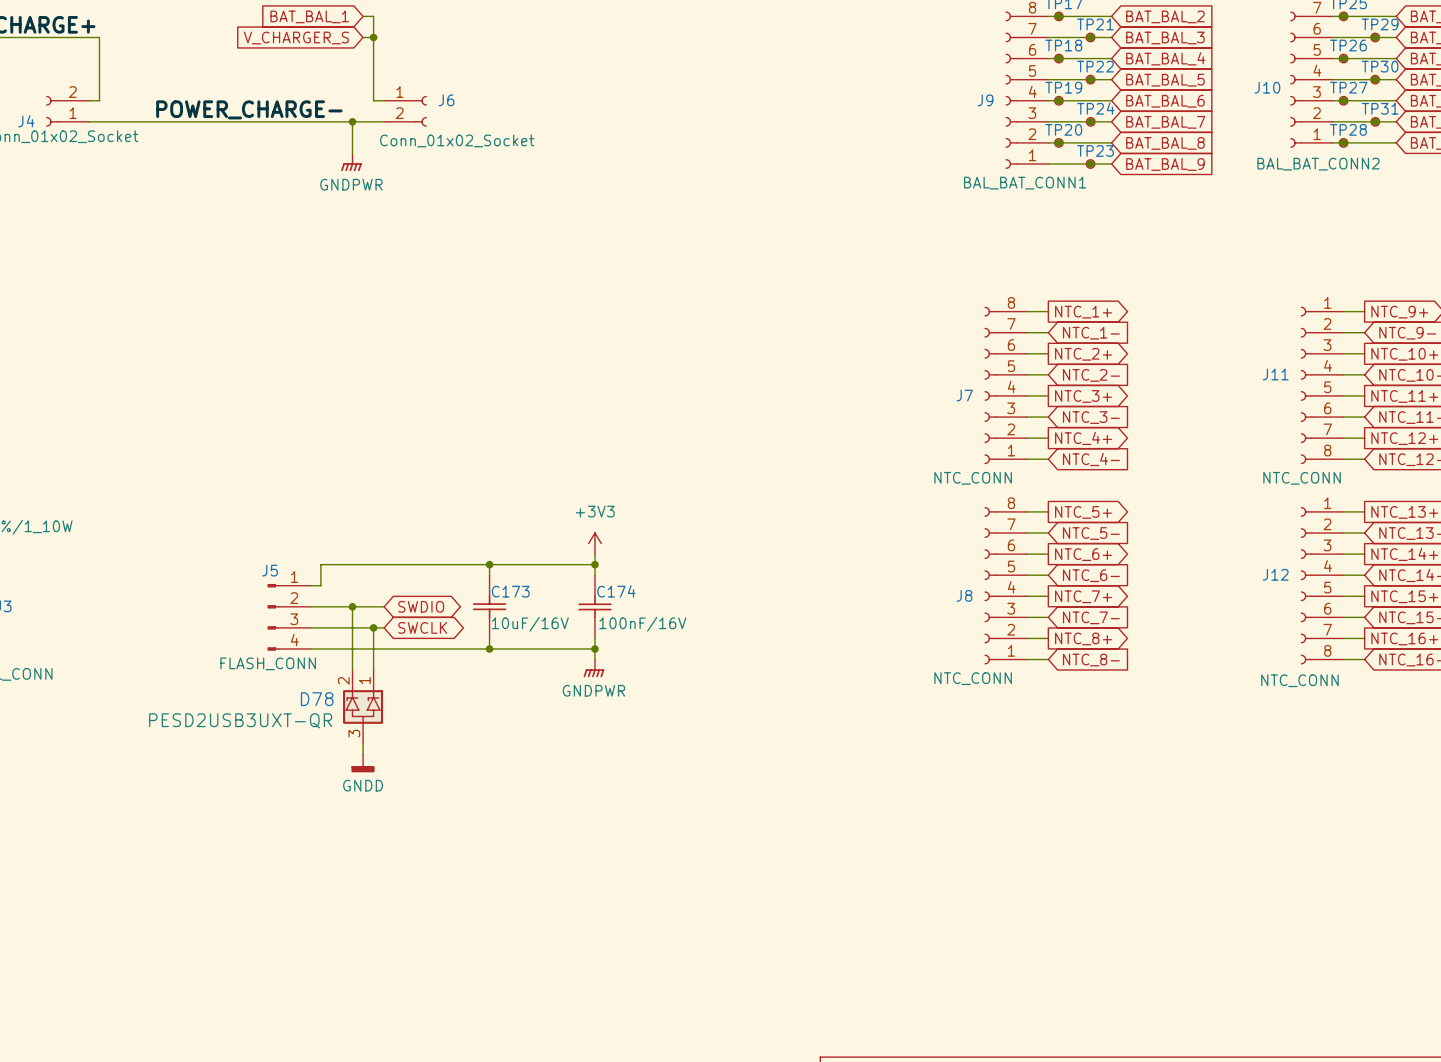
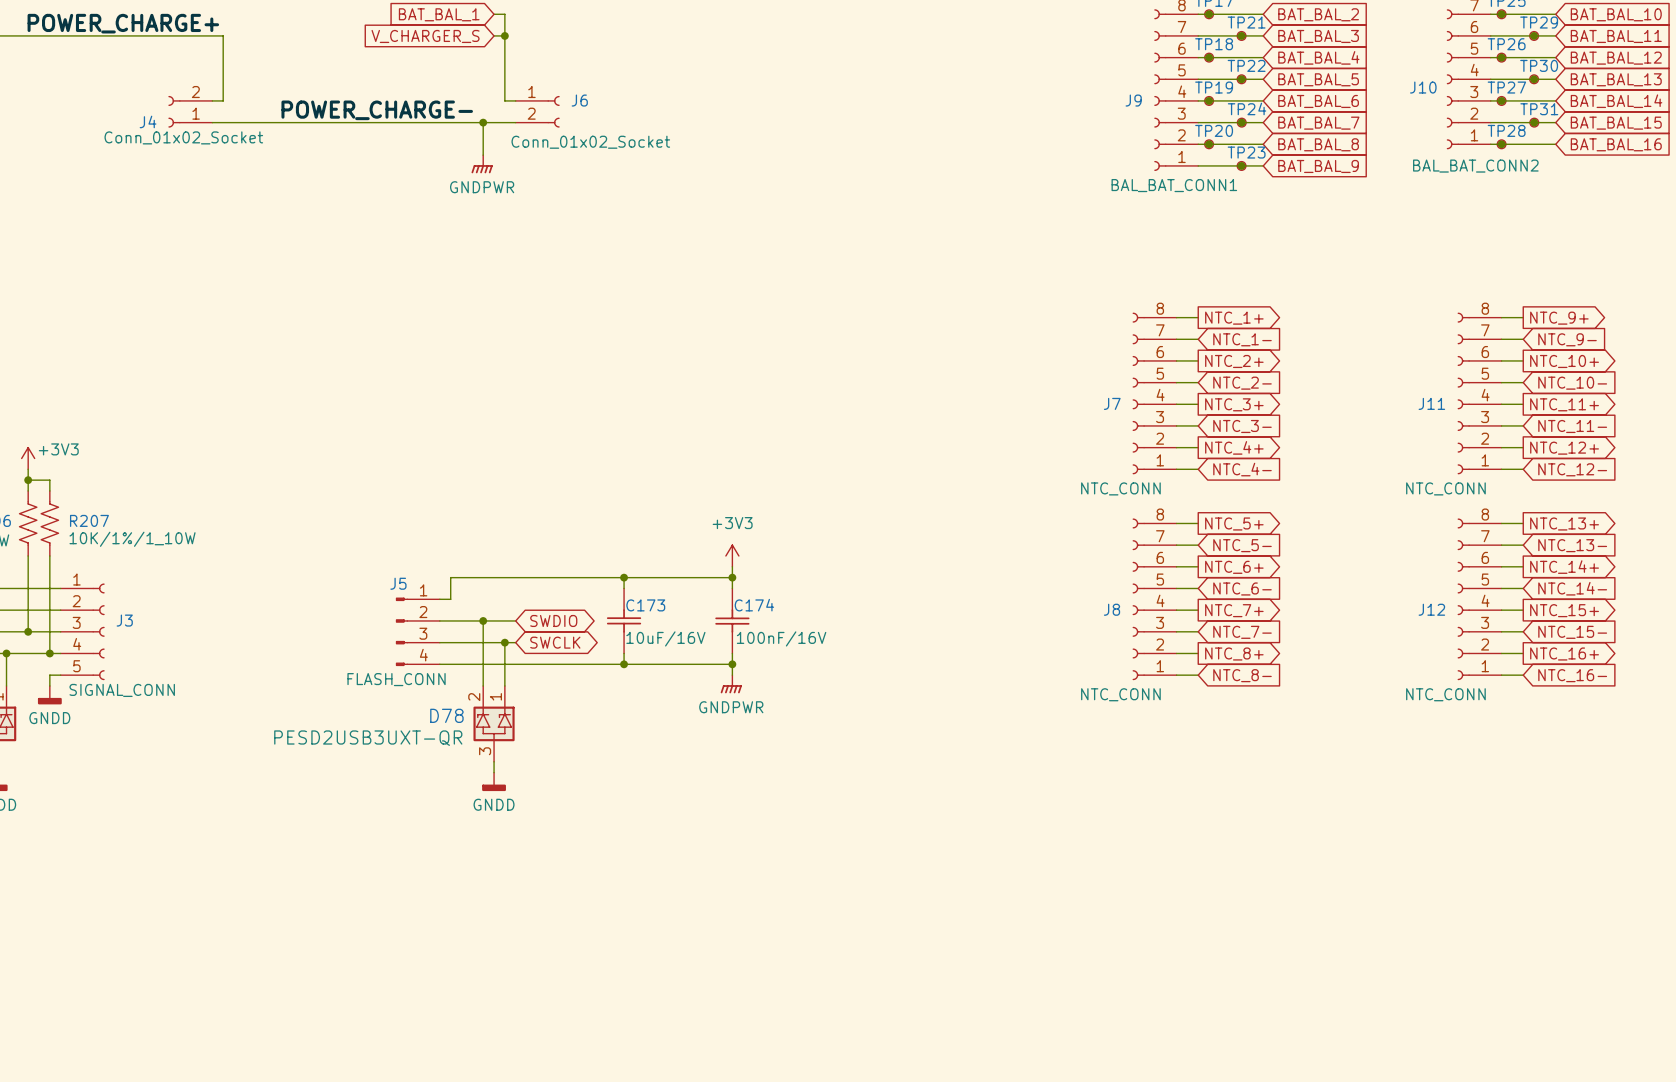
J11 flip: as is (1306, 385) -> up-down (1463, 393)
J12 flip: as is (1306, 585) -> up-down (1463, 599)

